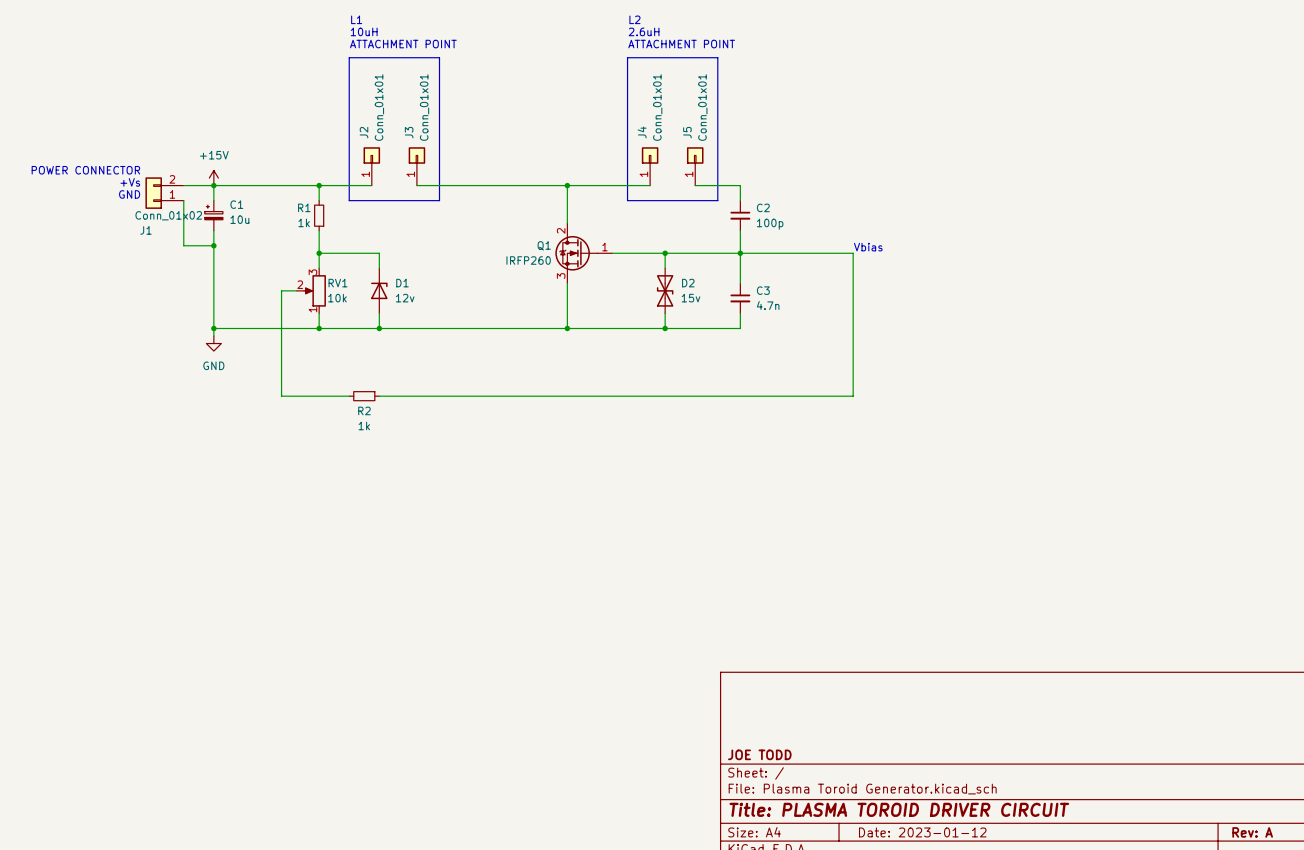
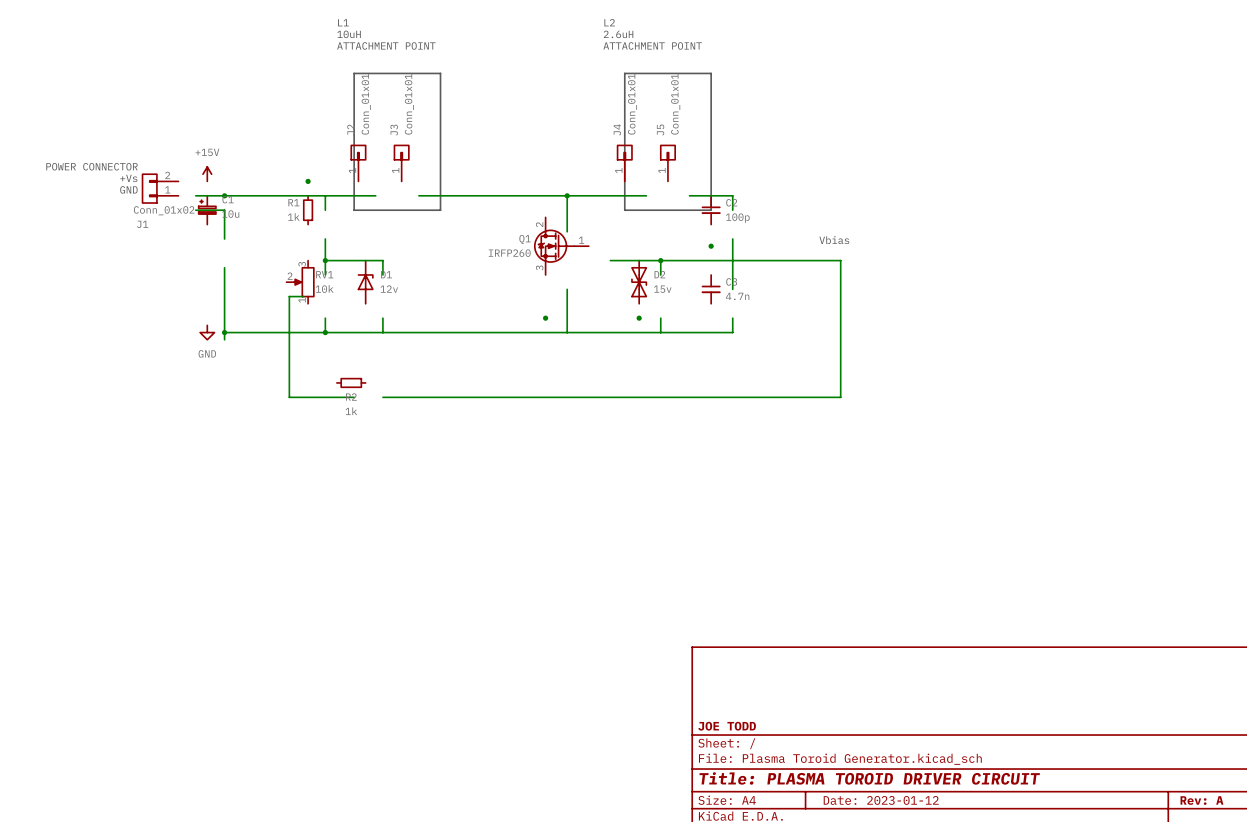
line: (349, 57) (439, 57) (439, 200) (349, 200) (349, 57) -> (354, 73) (440, 73) (440, 210) (354, 210) (354, 73)
line: (627, 57) (717, 57) (717, 200) (627, 200) (627, 57) -> (624, 73) (711, 73) (711, 210) (624, 210) (624, 73)
wire: (183, 185) (371, 185) -> (195, 195) (375, 195)
wire: (213, 185) (213, 200) -> none
junction position: (213, 185) -> (224, 195)
wire: (319, 185) (319, 200) -> (325, 195) (325, 210)
wire: (416, 185) (650, 185) -> none
wire: (567, 185) (567, 223) -> (567, 195) (567, 231)
junction position: (567, 185) -> (567, 195)
wire: (695, 185) (740, 185) (740, 200) -> (689, 195) (732, 195) (732, 210)
wire: (183, 200) (183, 245) (213, 245) -> none
wire: none -> (418, 195) (646, 195)
wire: none -> (195, 210) (224, 210) (224, 239)
wire: (213, 230) (213, 336) -> none
wire: (319, 230) (319, 268) -> (325, 239) (325, 274)
wire: (740, 230) (740, 283) -> (732, 239) (732, 289)
junction: (213, 245) -> none
wire: (319, 253) (379, 253) (379, 268) -> (325, 260) (382, 260) (382, 274)
junction position: (319, 253) -> (325, 260)
wire: (612, 253) (853, 253) (853, 396) (379, 396) -> none
wire: (665, 253) (665, 268) -> (660, 260) (660, 274)
junction position: (665, 253) -> (660, 260)
wire: none -> (610, 260) (840, 260) (840, 397) (382, 397)
wire: none -> (224, 267) (224, 339)
wire: (567, 283) (567, 328) -> (567, 289) (567, 332)
wire: (296, 290) (281, 290) (281, 396) (349, 396) -> (303, 296) (289, 296) (289, 397) (354, 397)
wire: (319, 313) (319, 328) -> (325, 318) (325, 332)
wire: (379, 313) (379, 328) -> (382, 318) (382, 332)
wire: (665, 313) (665, 328) -> (660, 318) (660, 332)
wire: (740, 313) (740, 328) (213, 328) -> none
junction position: (213, 328) -> (224, 332)
junction: (319, 328) -> none
junction: (379, 328) -> none
wire: none -> (732, 318) (732, 332) (224, 332)
junction: none -> (325, 332)

